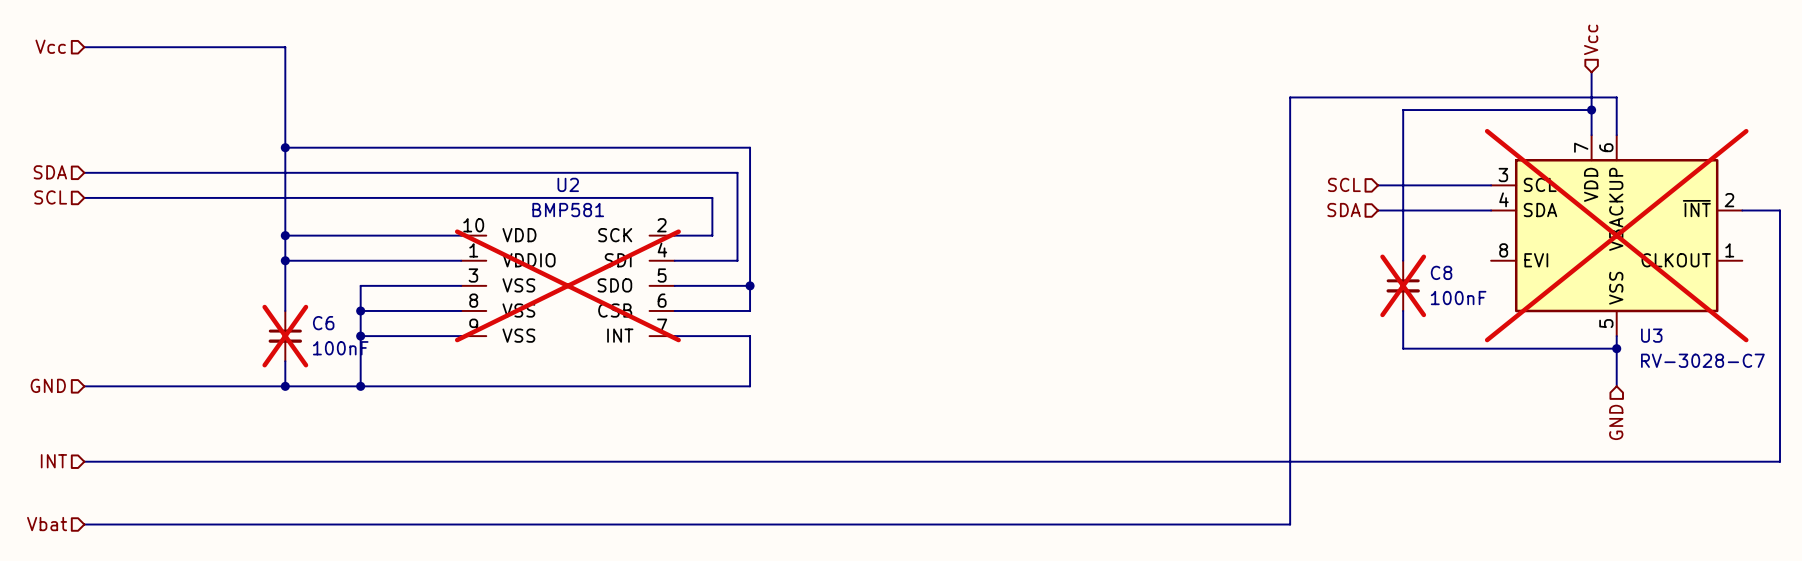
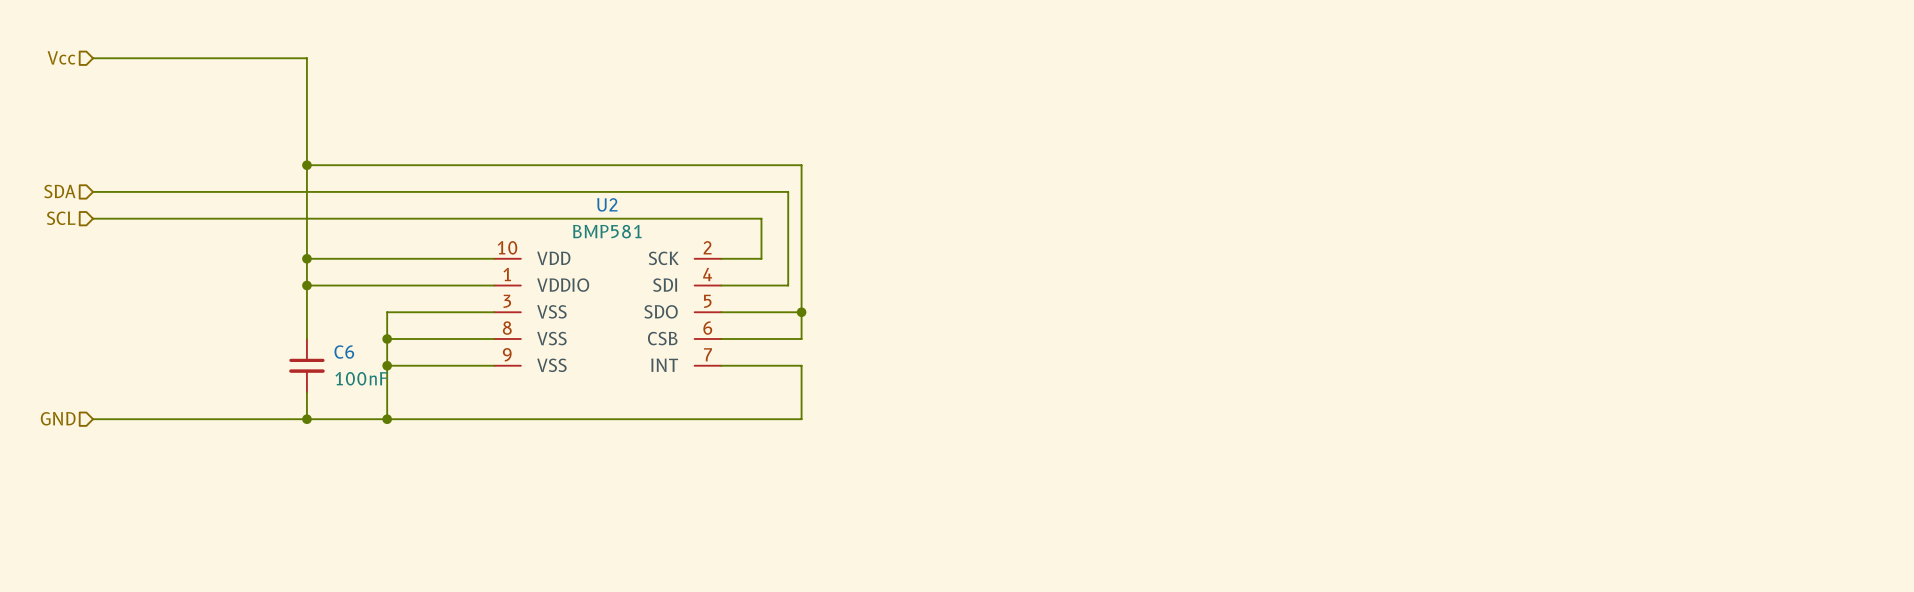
hierarchical label: Vcc (1591, 39) -> none
wire: (1591, 72) (1591, 135) -> none
wire: (1591, 110) (1403, 110) (1403, 260) -> none
junction: (1591, 110) -> none
wire: (1616, 135) (1616, 97) (1290, 97) (1290, 524) (84, 524) -> none
hierarchical label: SCL (1344, 184) -> none
wire: (1378, 185) (1491, 185) -> none
hierarchical label: SDA (1344, 210) -> none
wire: (1378, 210) (1491, 210) -> none
wire: (1742, 210) (1780, 210) (1780, 461) (84, 461) -> none
U3: RV-3028-C7 (1616, 235) -> none
U2 do-not-place cross: (567, 285) -> none
C8: 100nF (1403, 285) -> none
wire: (1403, 310) (1403, 348) (1616, 348) -> none
C6 do-not-place cross: (285, 336) -> none
wire: (1616, 336) (1616, 386) -> none
junction: (1616, 348) -> none
hierarchical label: GND (1616, 422) -> none
hierarchical label: INT (53, 461) -> none
hierarchical label: Vbat (47, 524) -> none

